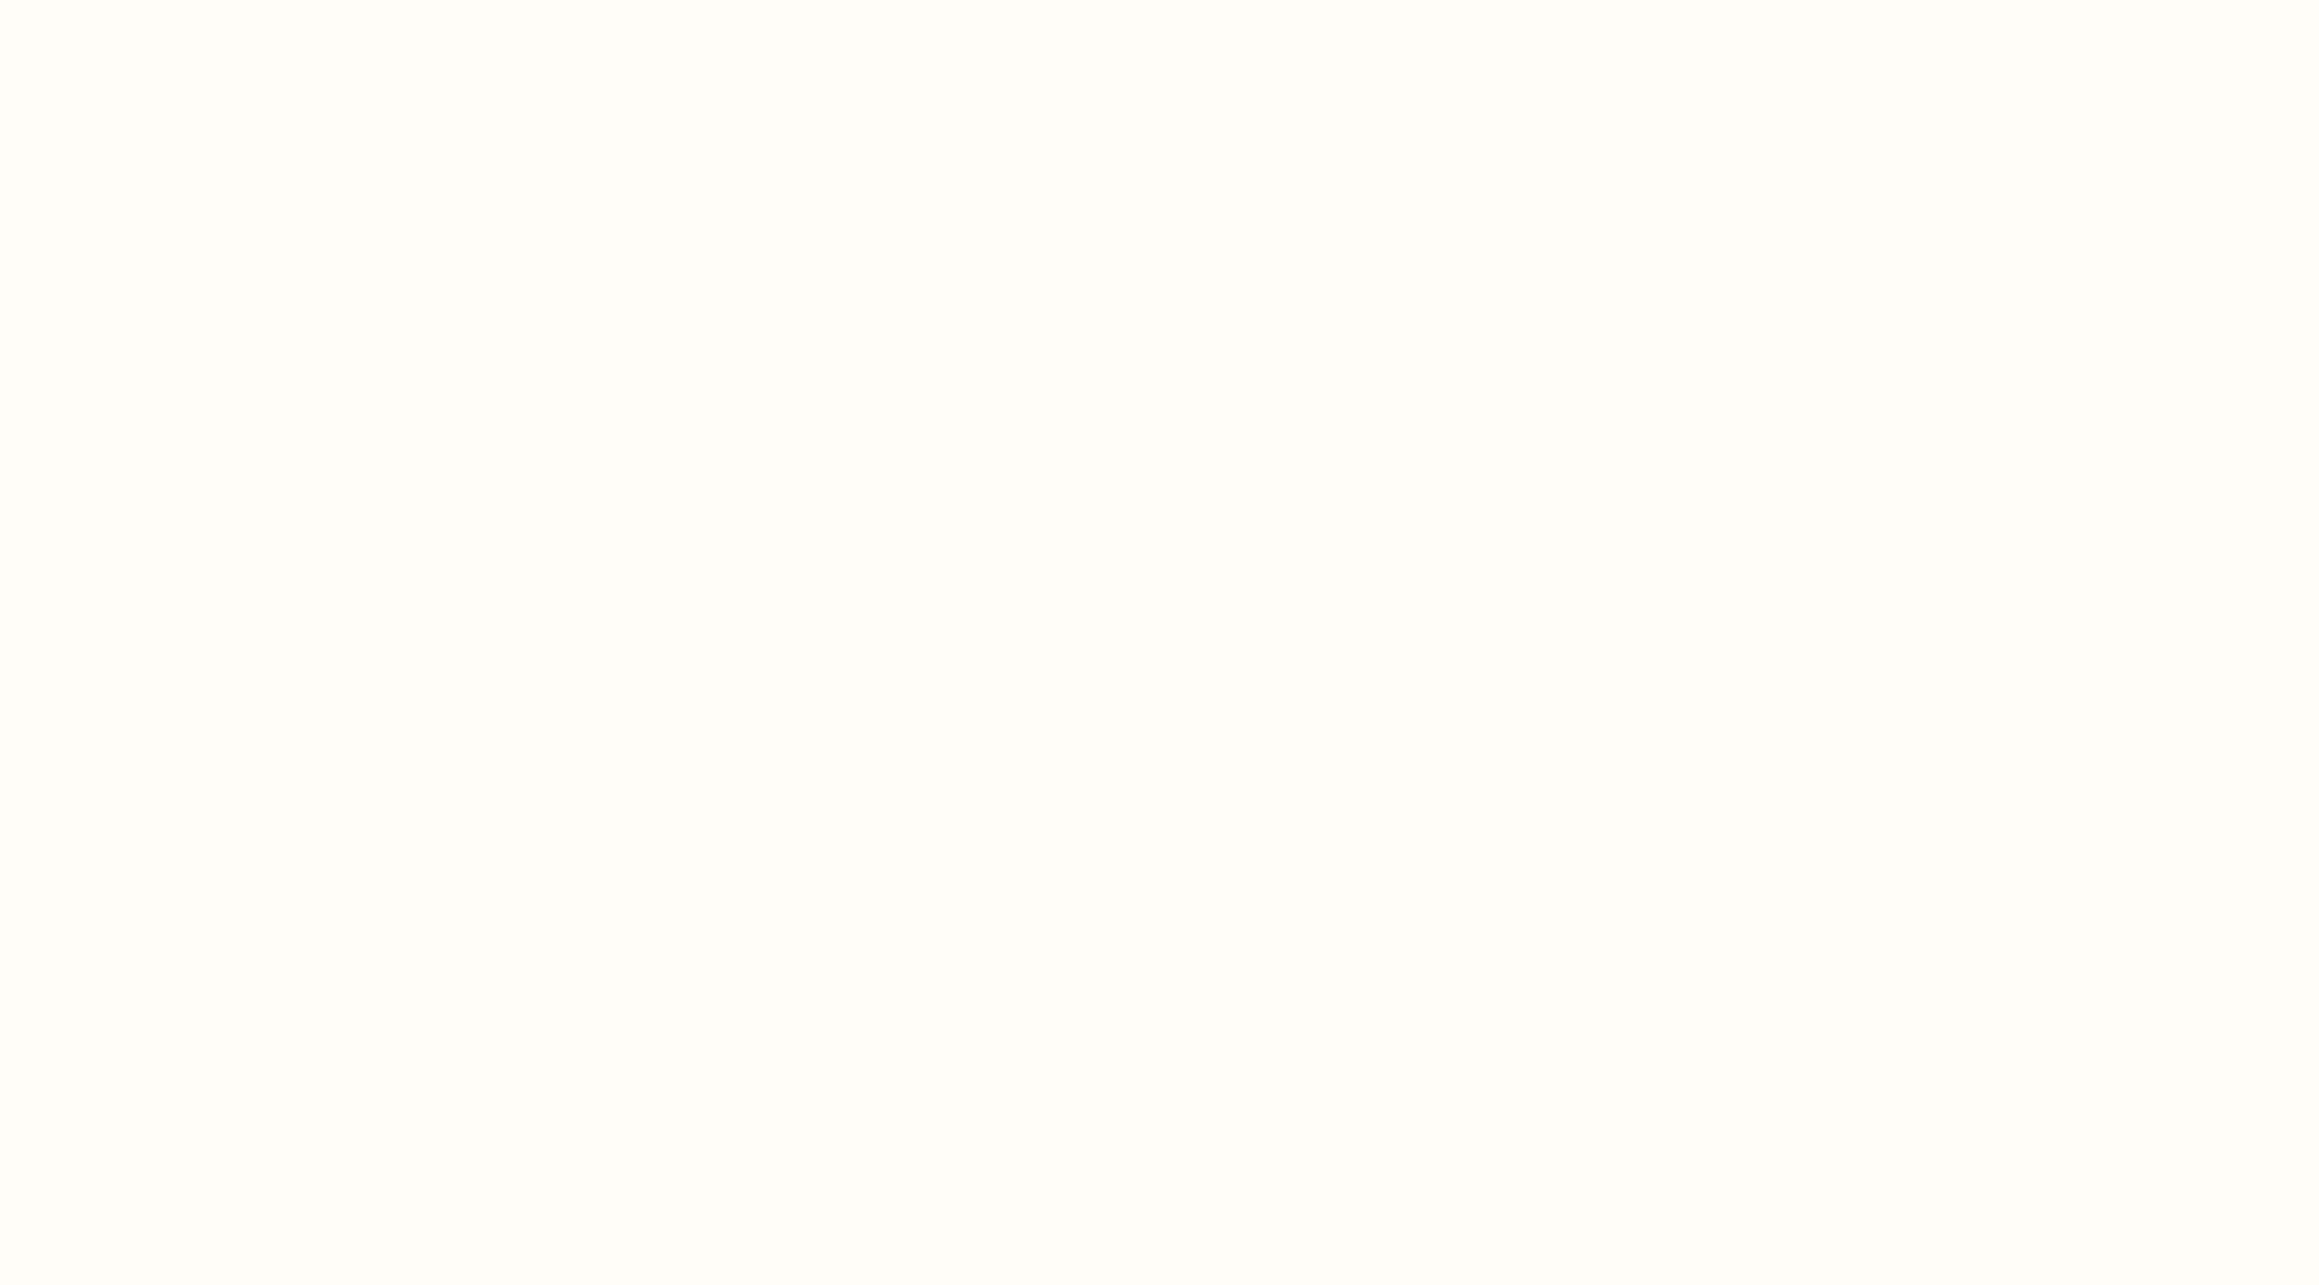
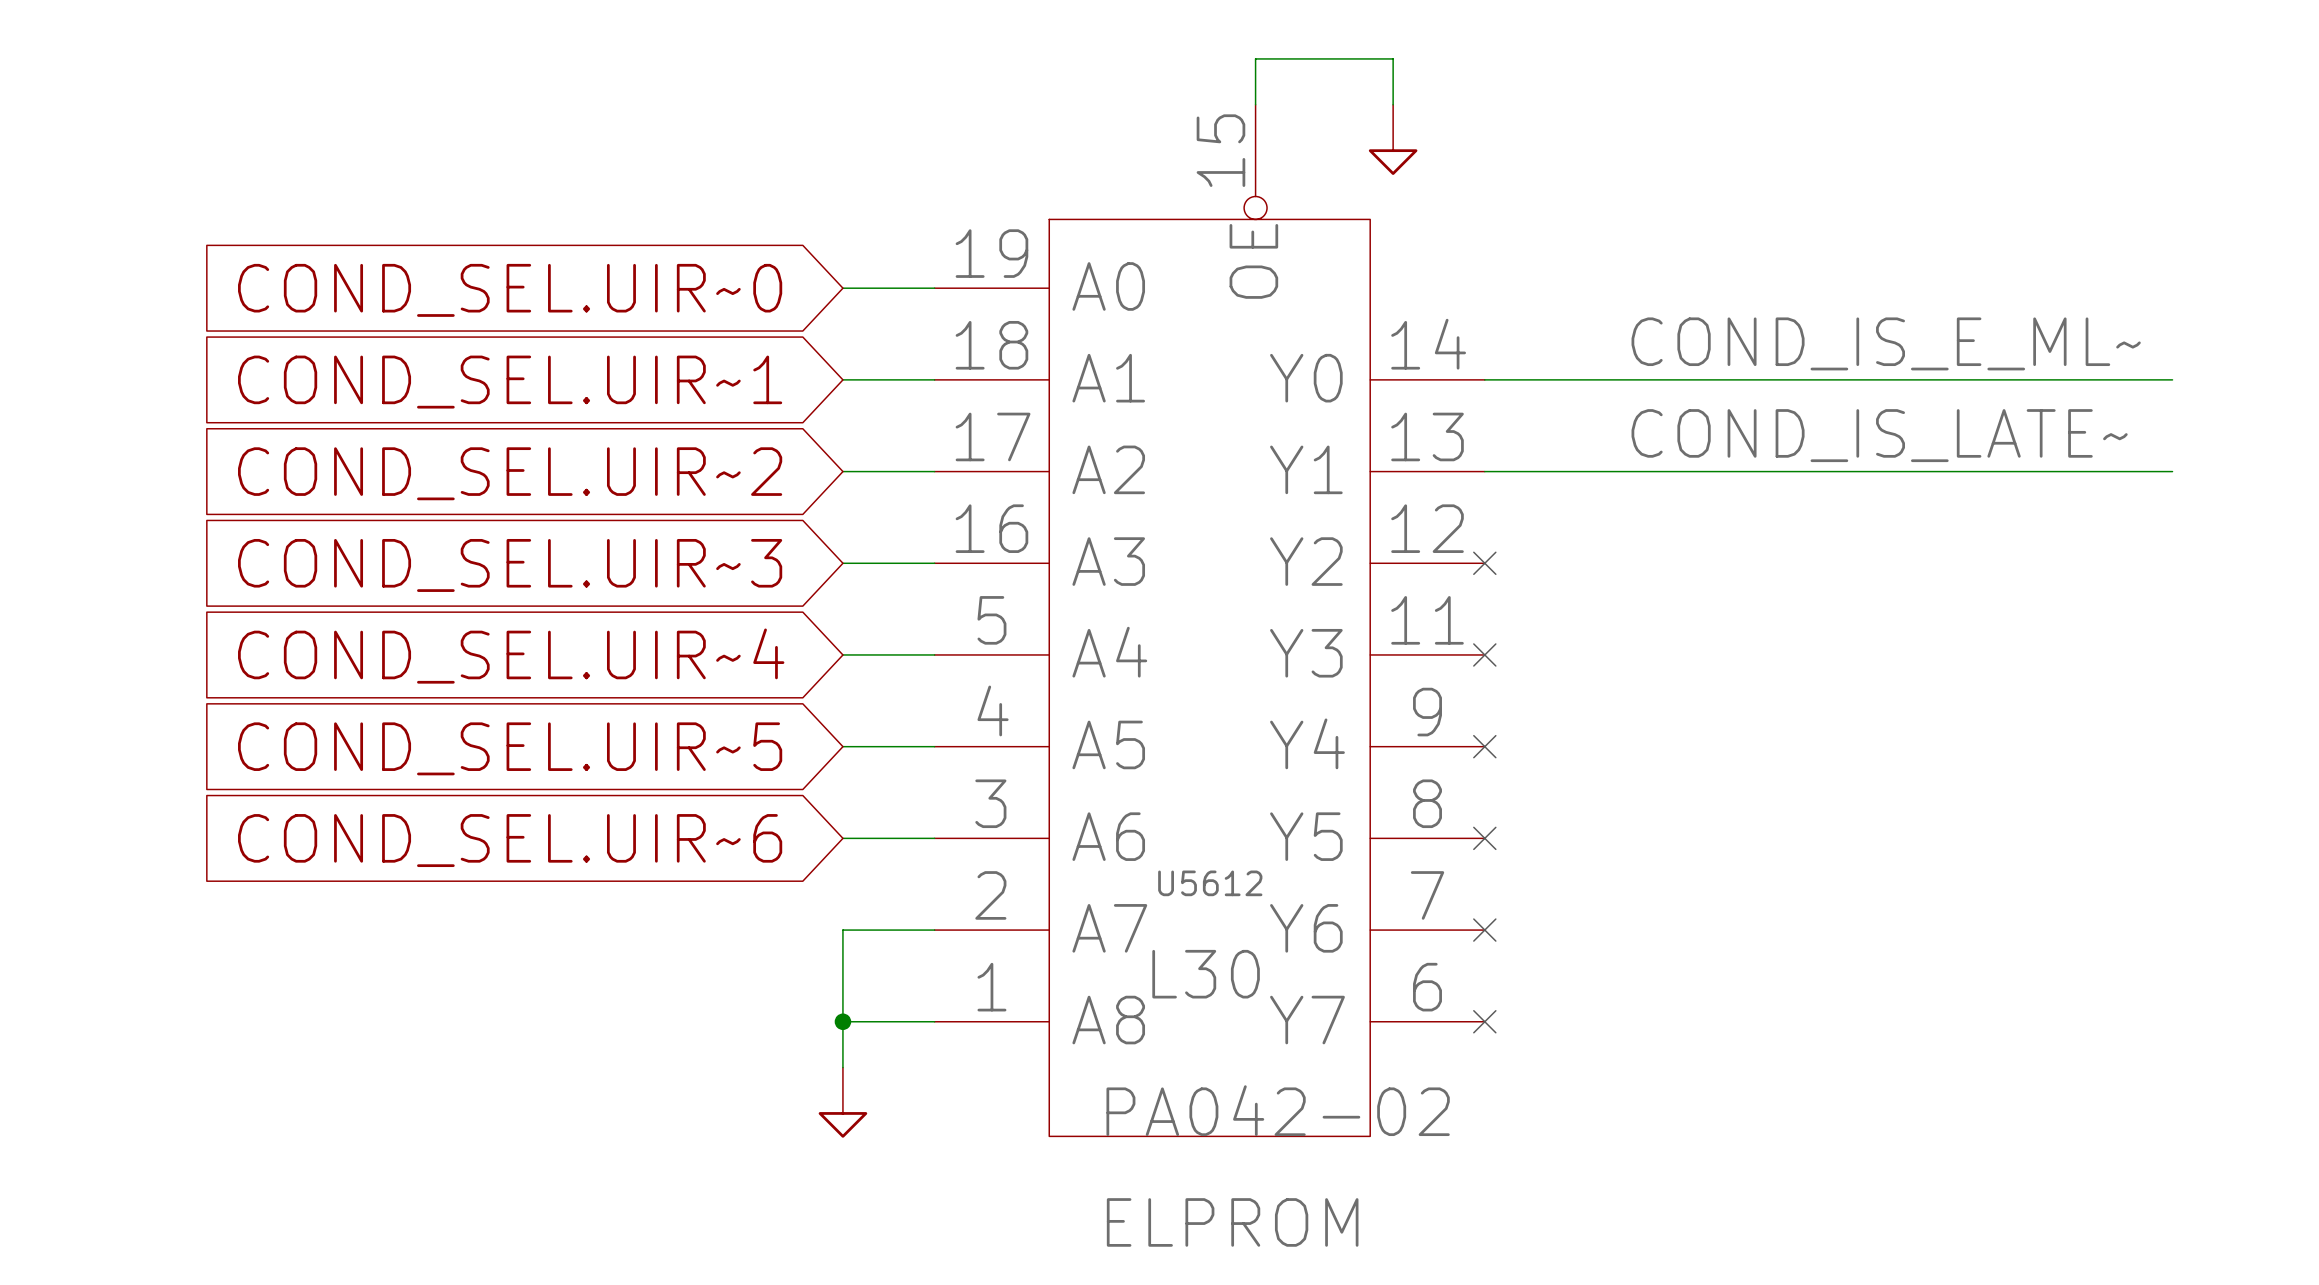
wire: none -> (1255, 104) (1255, 58) (1393, 58) (1393, 104)
power symbol: none -> (1393, 139)
wire: none -> (842, 288) (934, 288)
global label: none -> COND_SEL.UIR~0 (510, 290)
label: none -> COND_IS_E_ML~ (1886, 343)
wire: none -> (842, 379) (934, 379)
wire: none -> (1484, 379) (2172, 379)
global label: none -> COND_SEL.UIR~1 (510, 382)
label: none -> COND_IS_LATE~ (1879, 435)
wire: none -> (842, 471) (934, 471)
wire: none -> (1484, 471) (2172, 471)
global label: none -> COND_SEL.UIR~2 (510, 473)
wire: none -> (842, 563) (934, 563)
no-connect mark: none -> (1484, 563)
global label: none -> COND_SEL.UIR~3 (510, 565)
U5612: none -> PA042-02 (1209, 620)
wire: none -> (842, 654) (934, 654)
no-connect mark: none -> (1484, 654)
global label: none -> COND_SEL.UIR~4 (511, 656)
wire: none -> (842, 746) (934, 746)
no-connect mark: none -> (1484, 746)
global label: none -> COND_SEL.UIR~5 (510, 748)
wire: none -> (842, 838) (934, 838)
no-connect mark: none -> (1484, 838)
global label: none -> COND_SEL.UIR~6 (510, 840)
wire: none -> (934, 930) (842, 930) (842, 1067)
no-connect mark: none -> (1484, 930)
wire: none -> (842, 1021) (934, 1021)
junction: none -> (842, 1021)
no-connect mark: none -> (1484, 1021)
power symbol: none -> (842, 1102)

